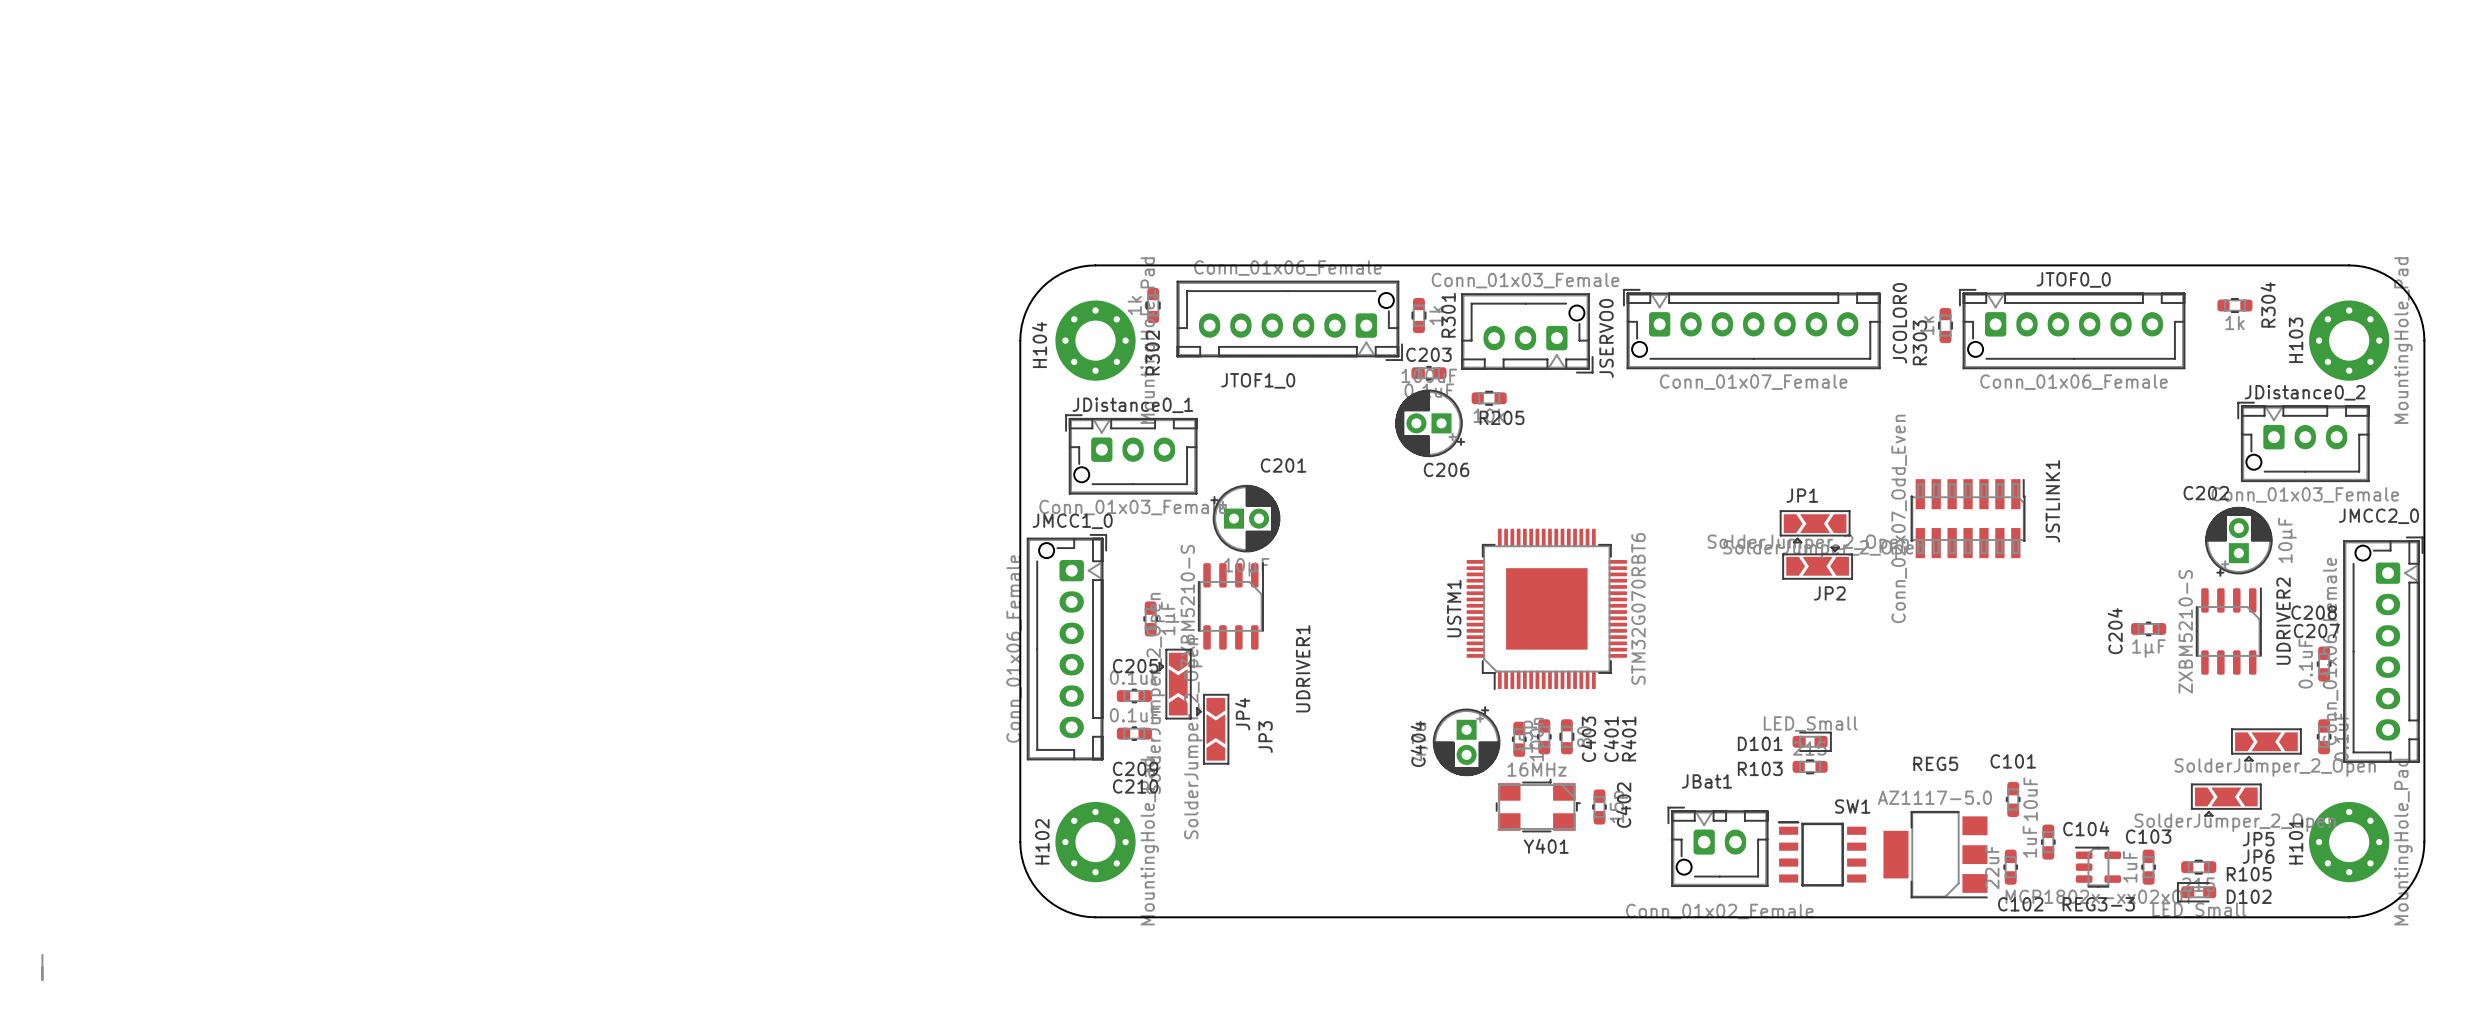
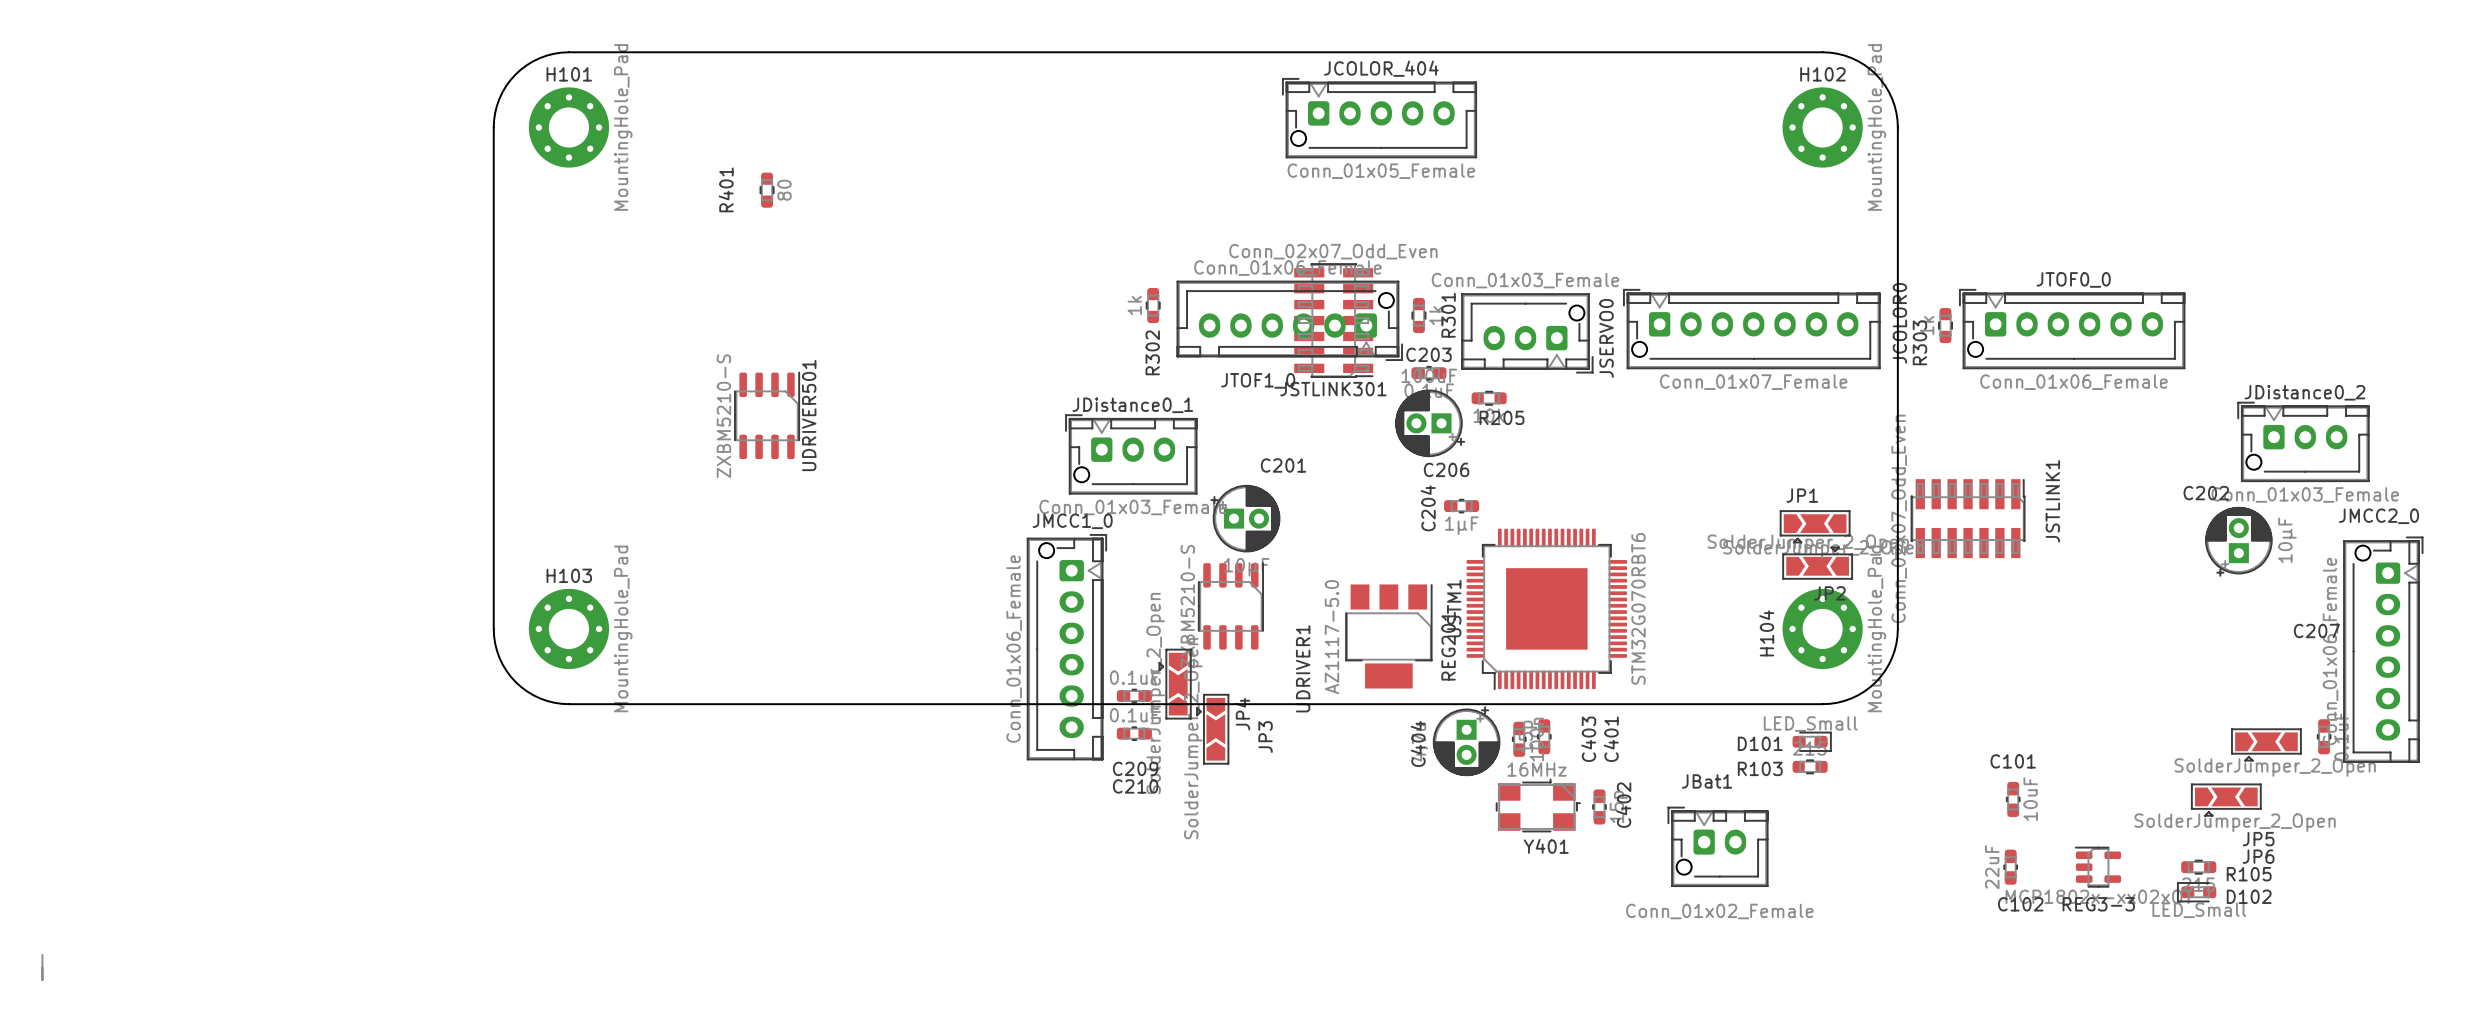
board edge: none -> (568, 52) (1822, 52) (1851, 57) (1870, 69) (1885, 85) (1894, 105) (1897, 120) (1897, 628) (1892, 657) (1880, 676) (1864, 691) (1844, 700) (1822, 704) (568, 704) (540, 698) (521, 687) (506, 670) (496, 650) (494, 636) (493, 127) (499, 98) (515, 74) (540, 57) (568, 52)
JCOLOR_404: none -> Conn_01x05_Female (1379, 118)
board edge: (1095, 265) (2349, 265) (2377, 271) (2390, 278) (2407, 292) (2418, 311) (2424, 333) (2424, 842) (2418, 870) (2407, 889) (2390, 904) (2371, 914) (2349, 917) (1095, 917) (1066, 911) (1053, 904) (1037, 889) (1026, 870) (1020, 849) (1020, 340) (1026, 311) (1042, 287) (1066, 271) (1095, 265) -> none
R304: 1k (2234, 305) -> none
JSTLINK301: none -> Conn_02x07_Odd_Even (1333, 320)
H104 position: (1095, 340) -> (1822, 628)
H103 name rotation: 0° (2296, 340) -> 90° clockwise (569, 575)
H103 name position: H103 (2296, 340) -> H103 (569, 575)
H103 position: (2349, 340) -> (568, 628)
UDRIVER501: none -> ZXBM5210-S (767, 415)
C205: 1µF (1150, 618) -> none
C204 position: (2148, 628) -> (1461, 506)
UDRIVER2: ZXBM5210-S (2228, 631) -> none
REG201: none -> AZ1117-5.0 (1388, 636)
C208: 0.1uF (2324, 664) -> none
R401 position: (1566, 736) -> (767, 190)
R401 name position: R401 (1628, 738) -> R401 (726, 189)
H102 name rotation: 0° (1042, 841) -> 90° clockwise (1822, 74)
H102 name position: H102 (1042, 841) -> H102 (1822, 74)
H101 name rotation: 0° (2296, 841) -> 90° clockwise (569, 74)
H101 name position: H101 (2296, 841) -> H101 (569, 74)
H102 position: (1095, 842) -> (1822, 127)
C104: 1uF (2048, 842) -> none
H101 position: (2349, 842) -> (568, 127)
SW1: (1822, 853) -> none
REG5: AZ1117-5.0 (1935, 854) -> none
C103: 1uF (2148, 867) -> none

